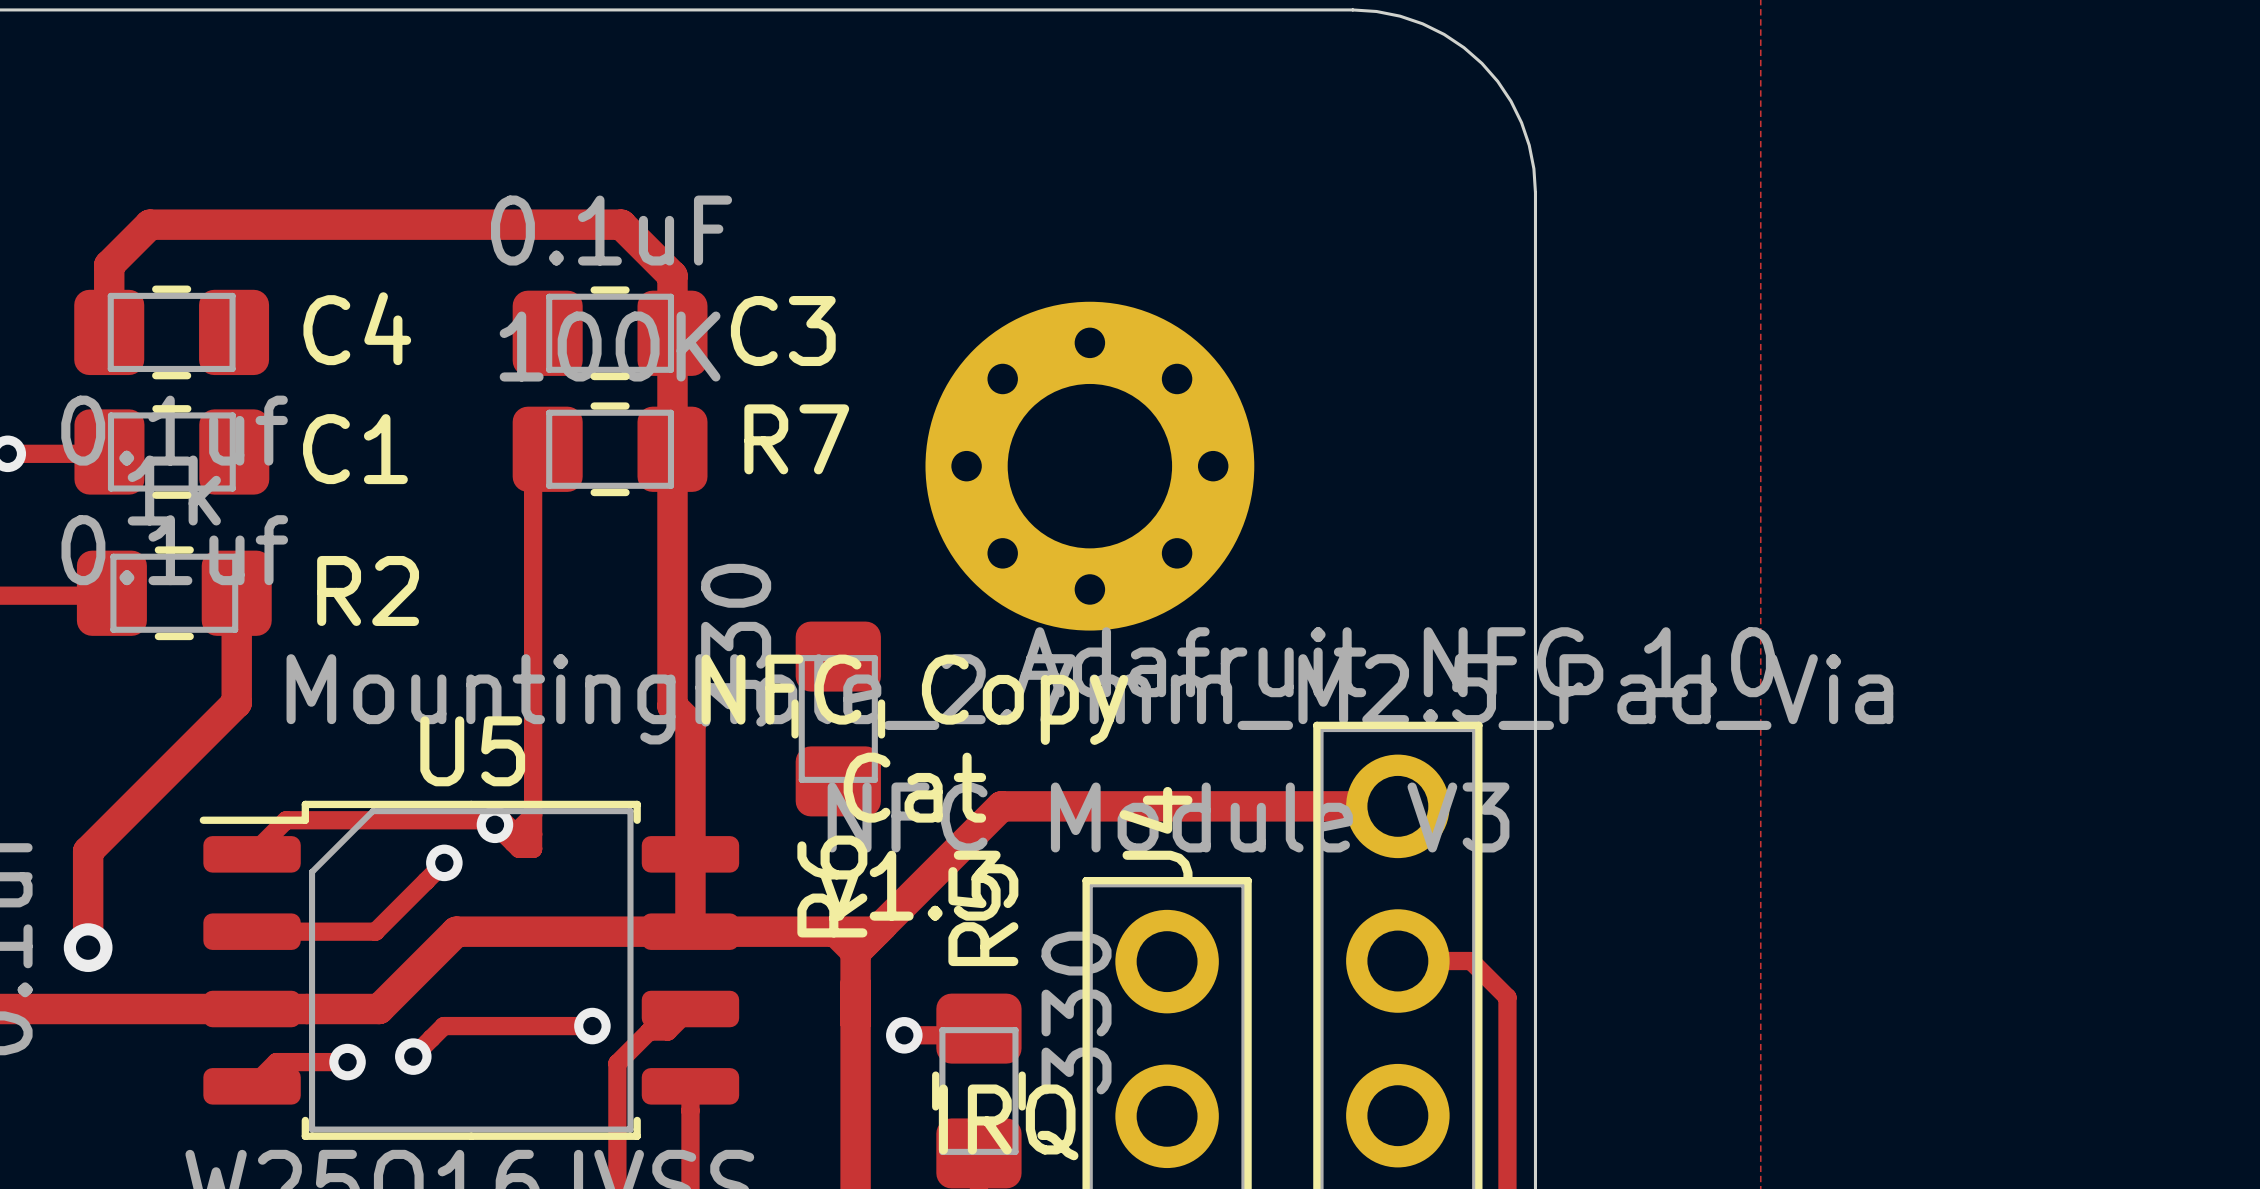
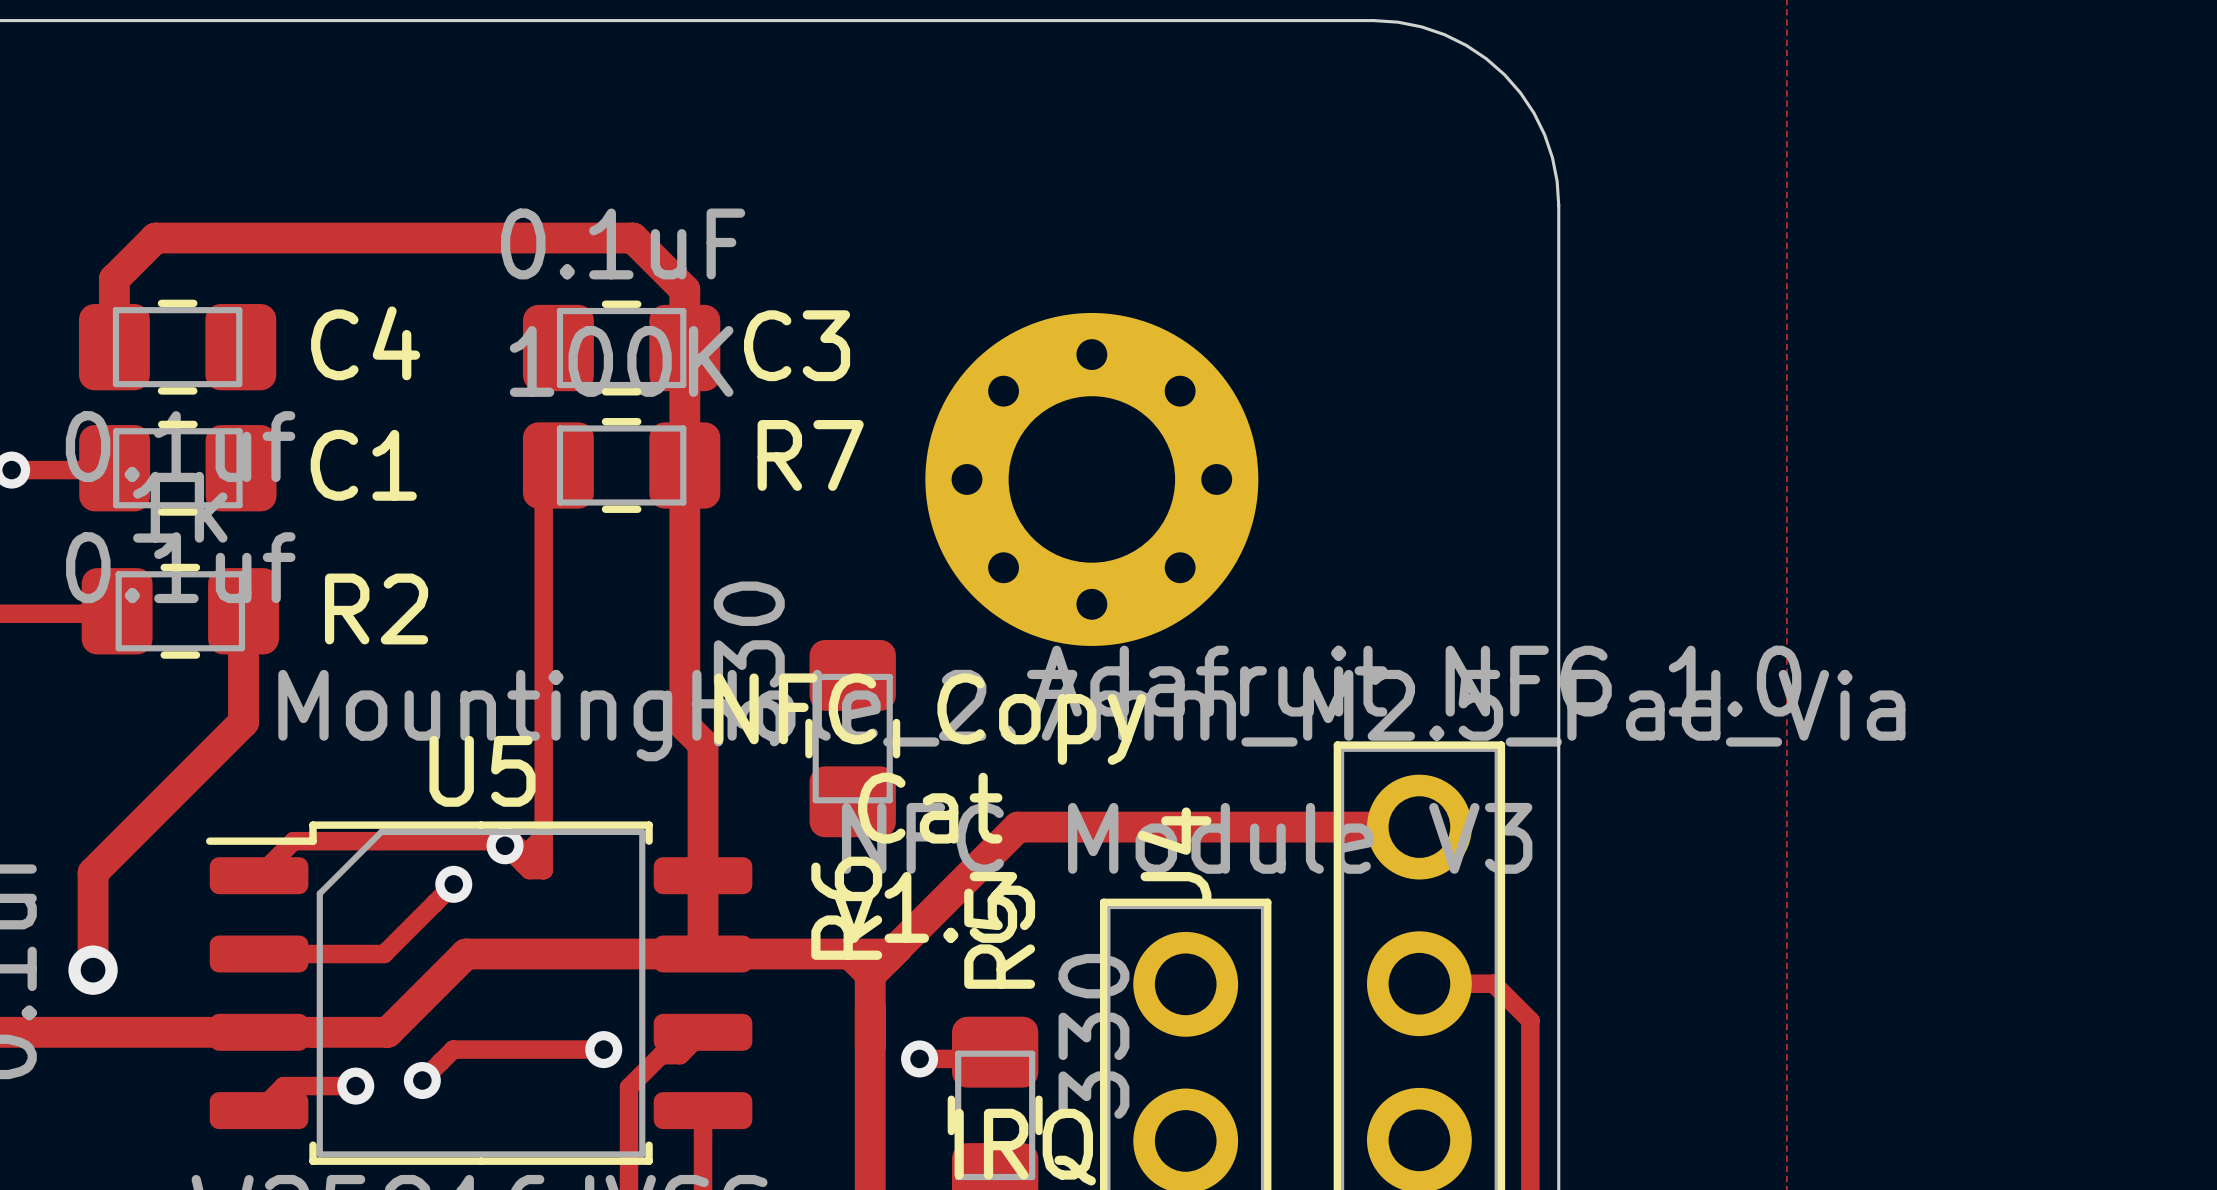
part position: (1089, 466) -> (1091, 479)

